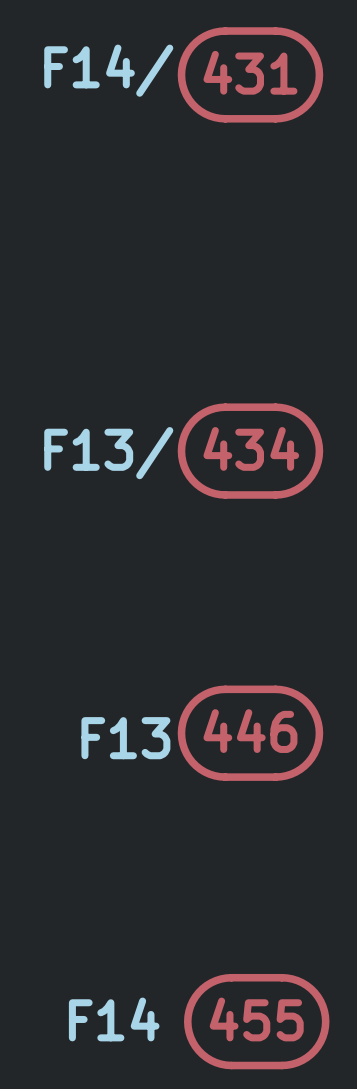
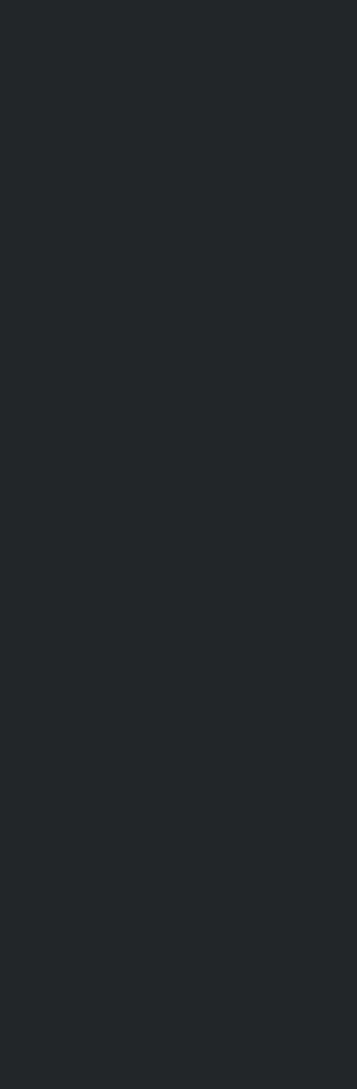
part: (250, 74) -> none
part: (250, 451) -> none
part: (250, 733) -> none
part: (256, 1021) -> none

